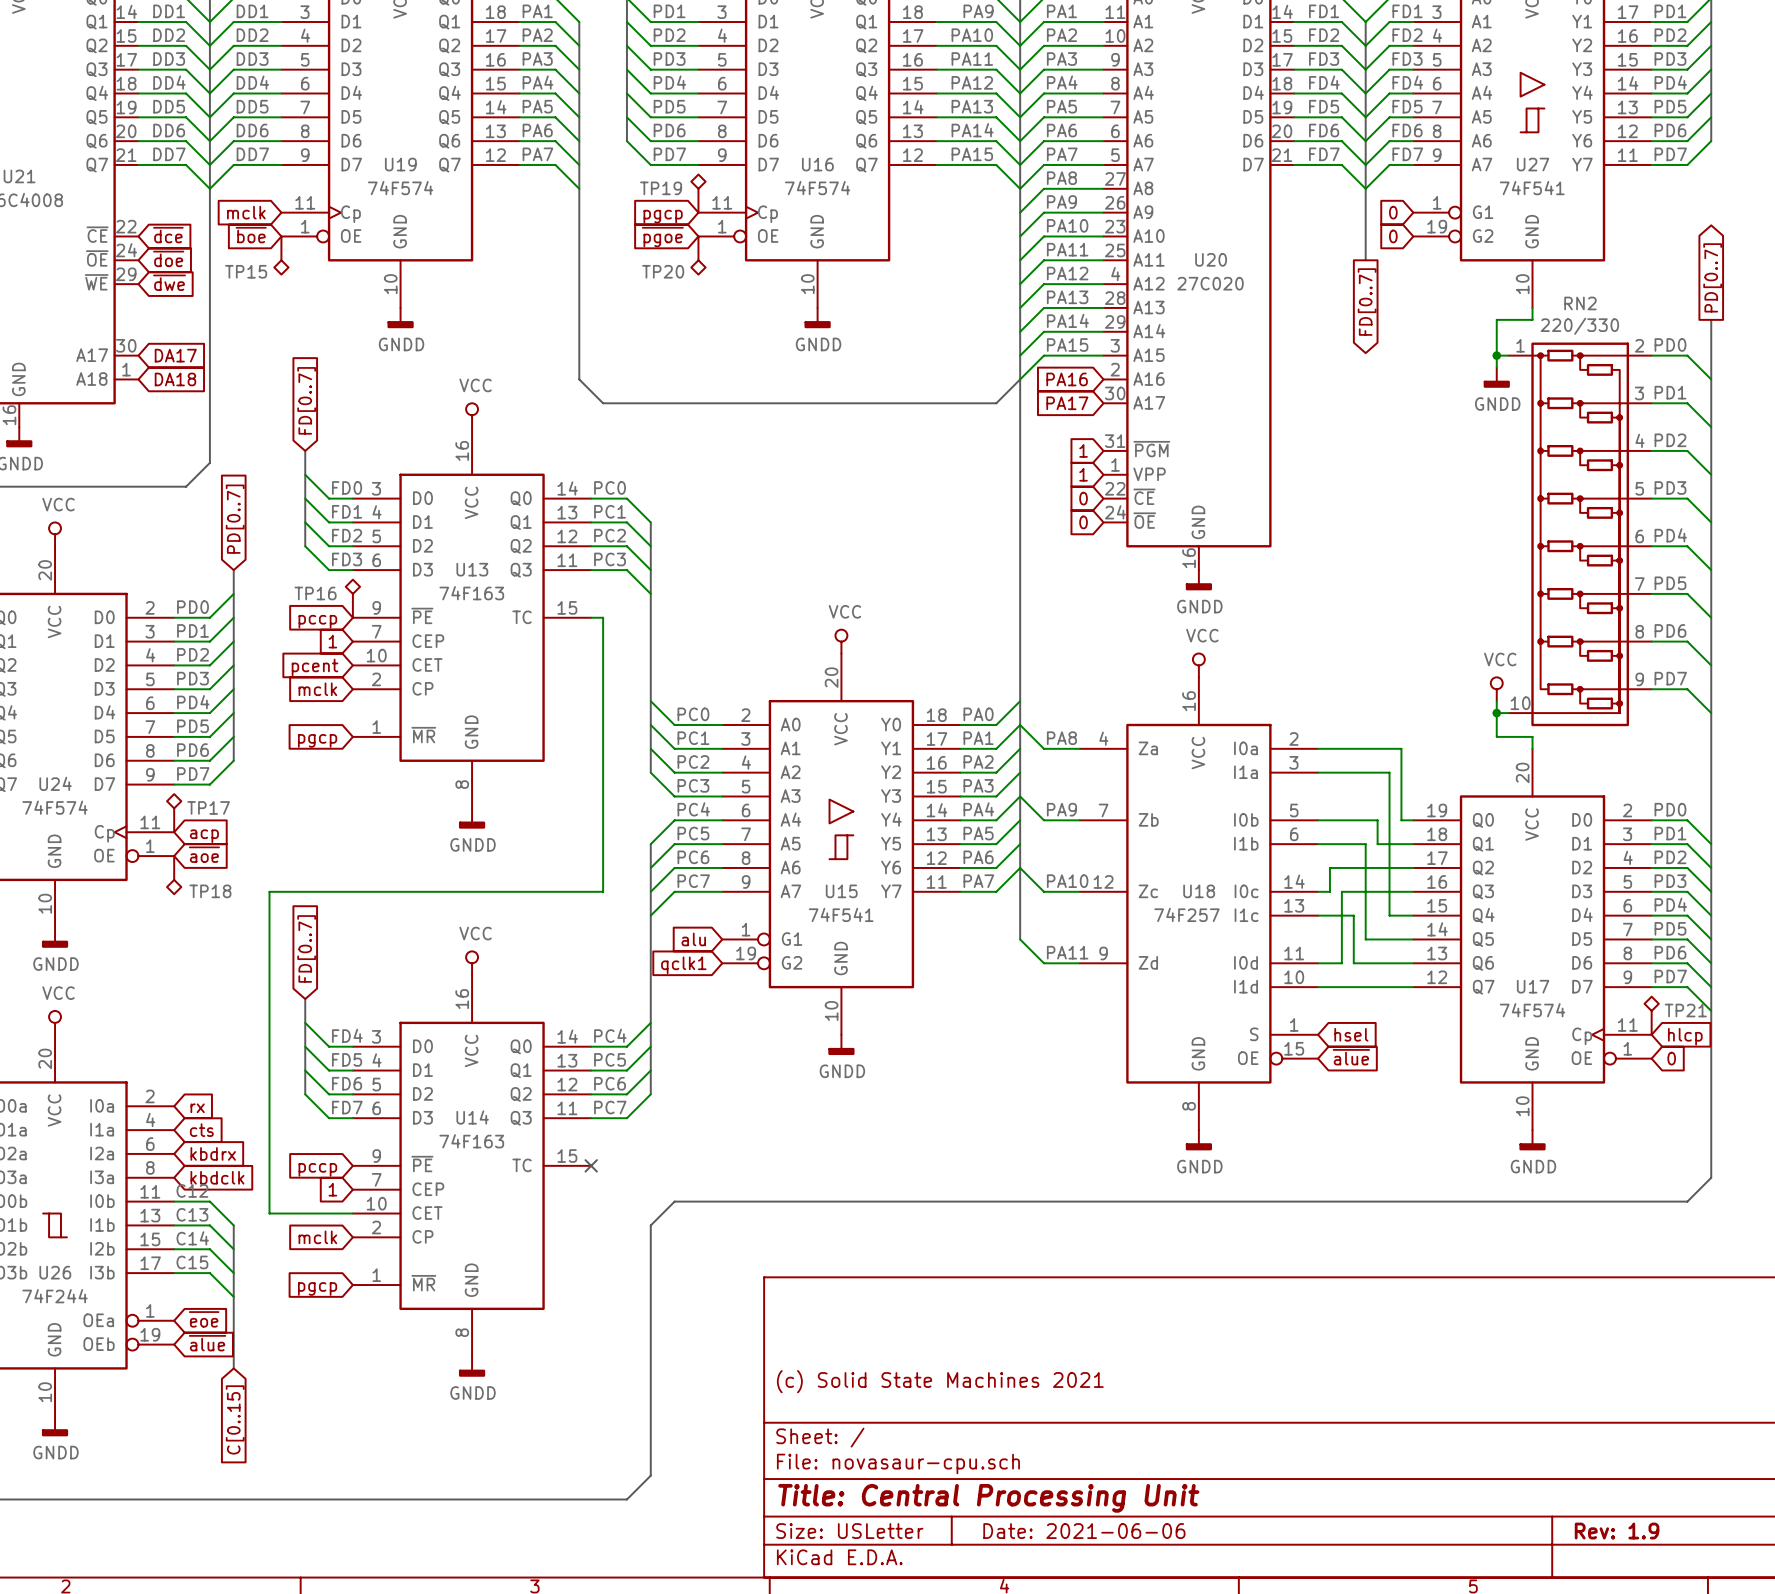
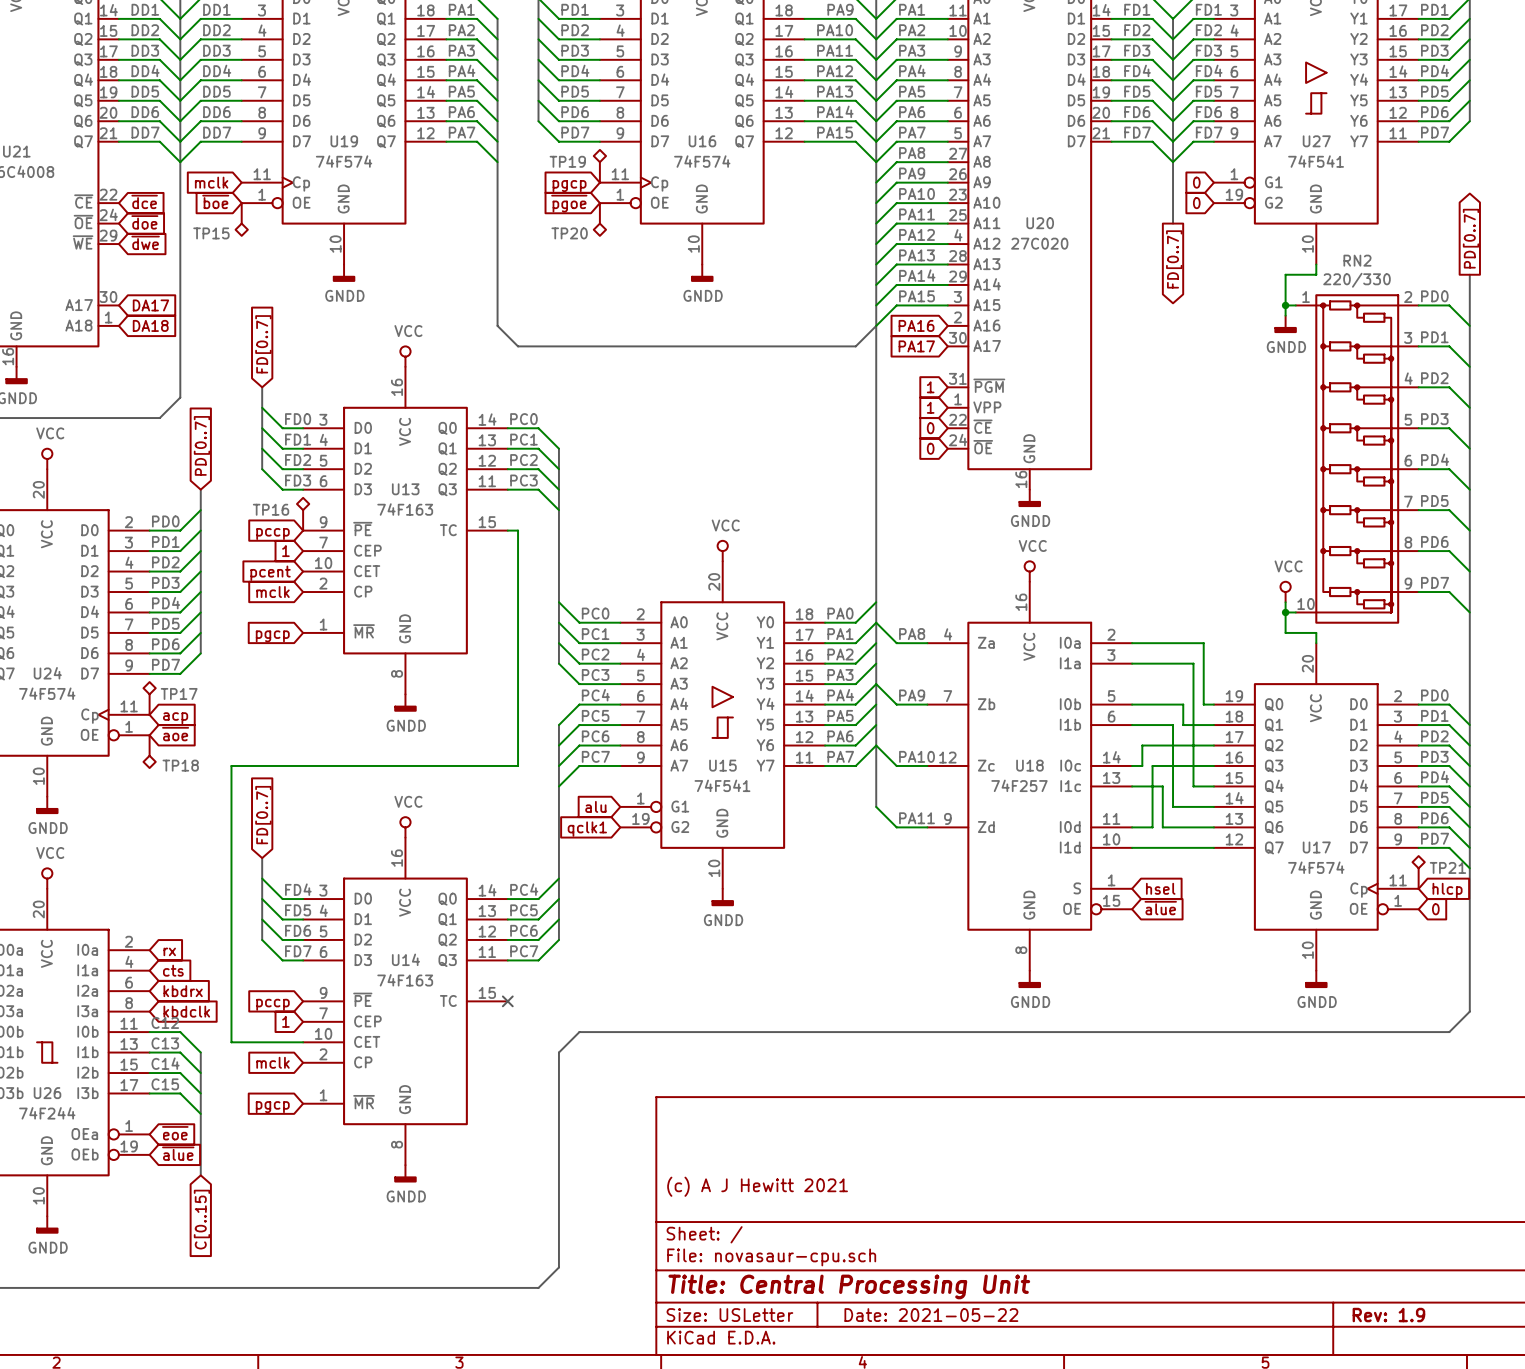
title block: (c) Solid State Machines 2021 (940, 1381) -> (c) A J Hewitt 2021 (757, 1186)
title block: Date: 2021-06-06 (1084, 1531) -> Date: 2021-05-22 (931, 1315)

